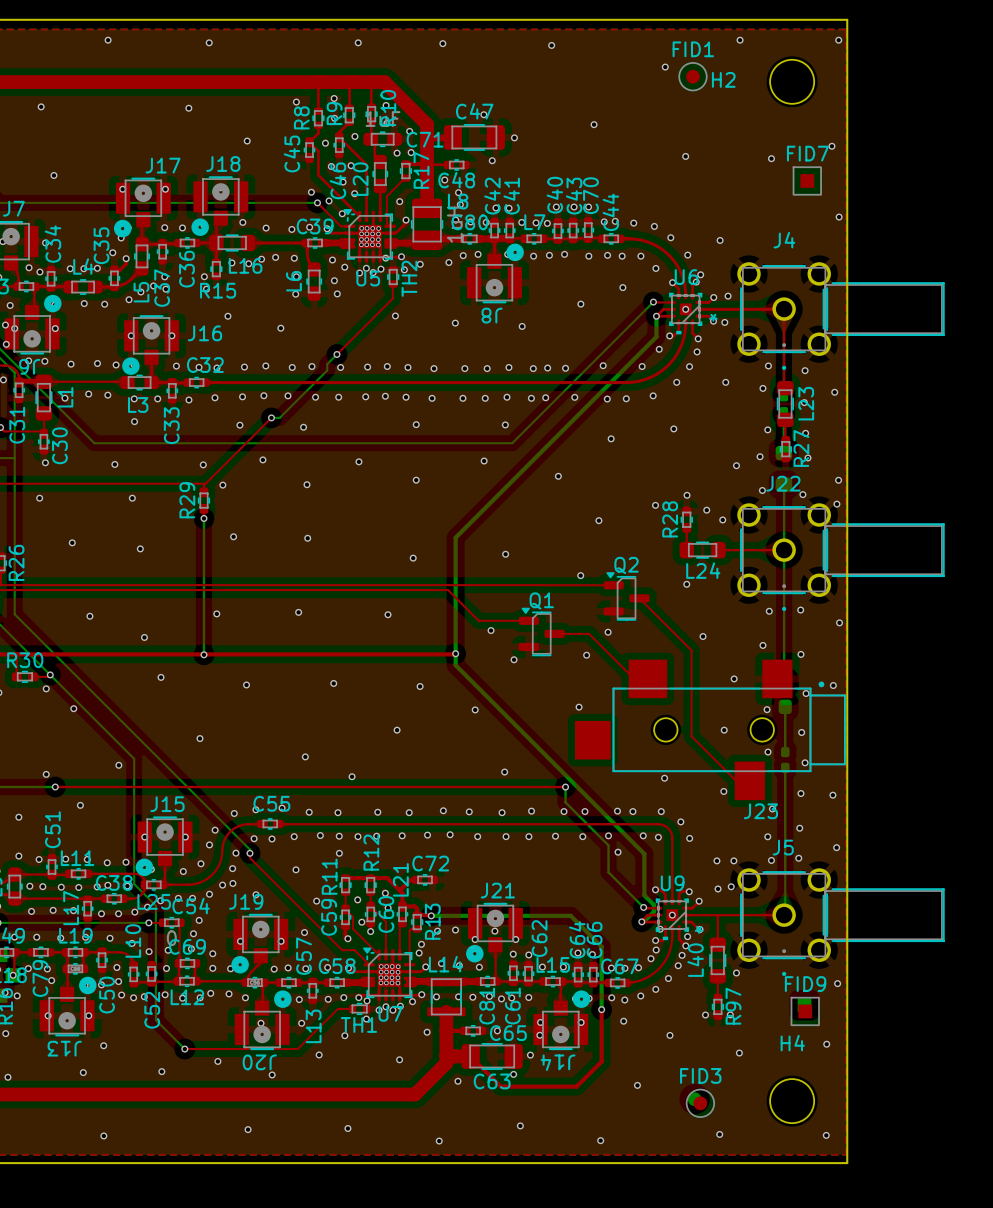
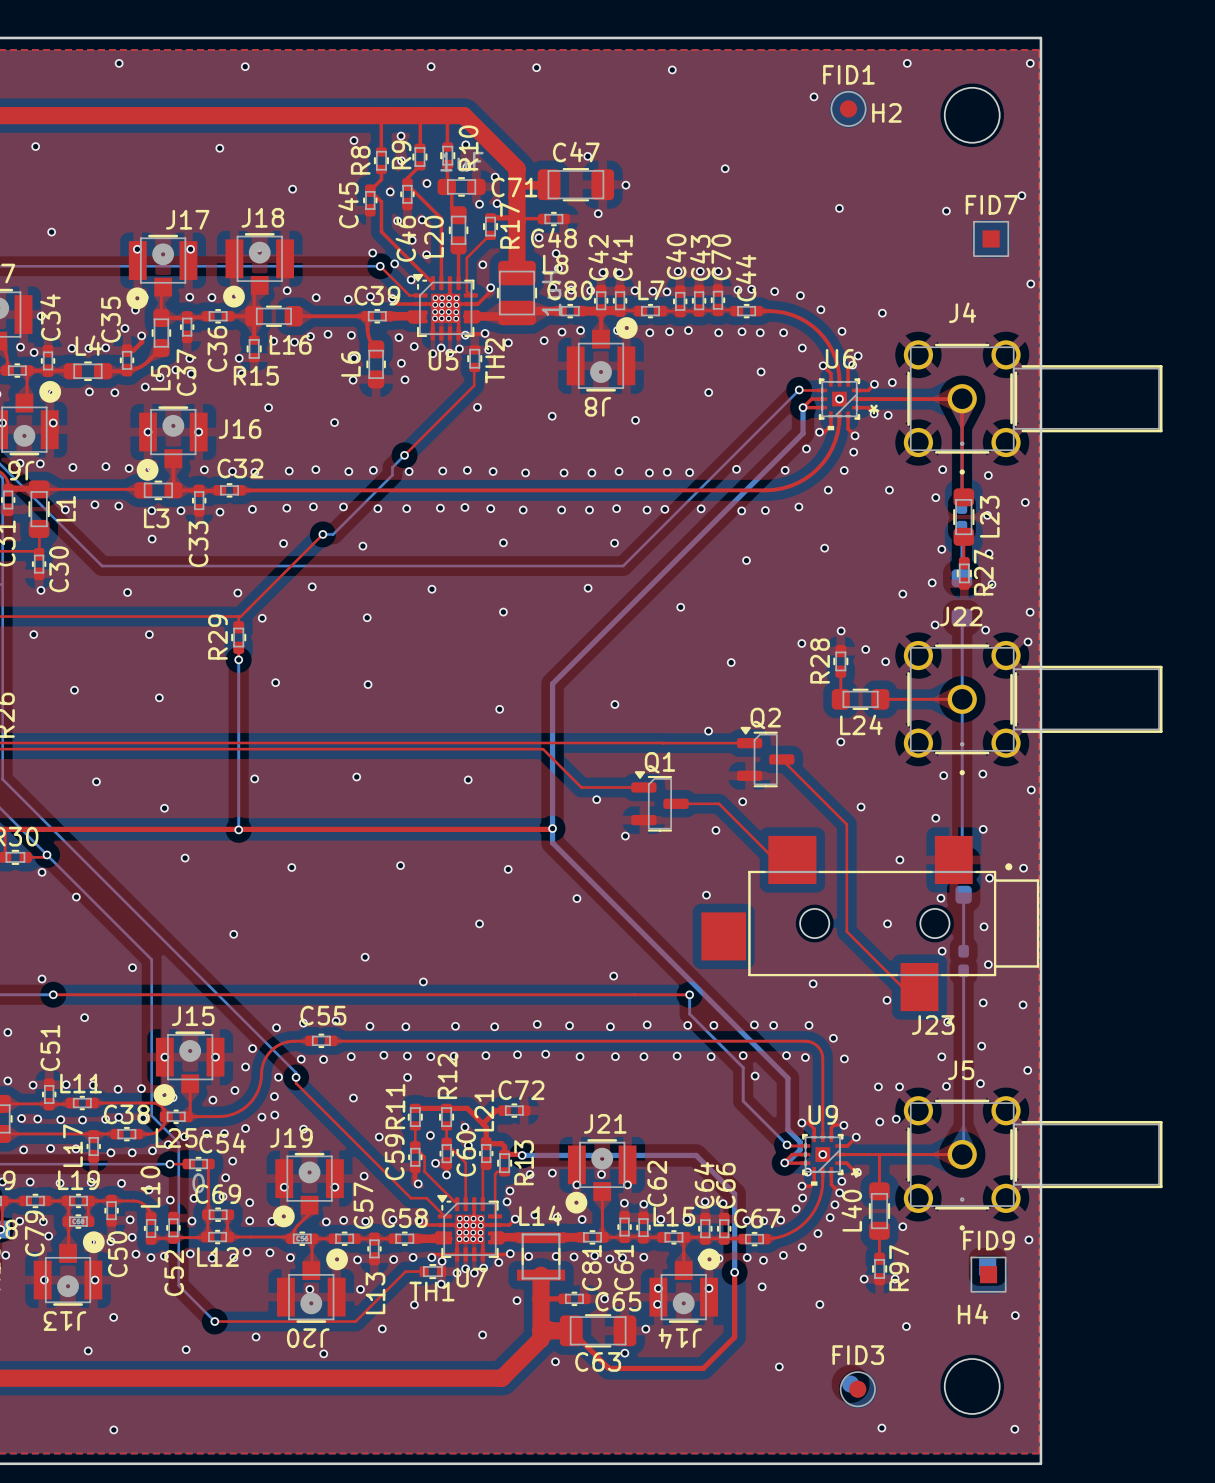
via: (520, 1125) -> none
via: (347, 1128) -> none
via: (248, 1129) -> none
via: (600, 1140) -> none
via: (439, 1141) -> none

